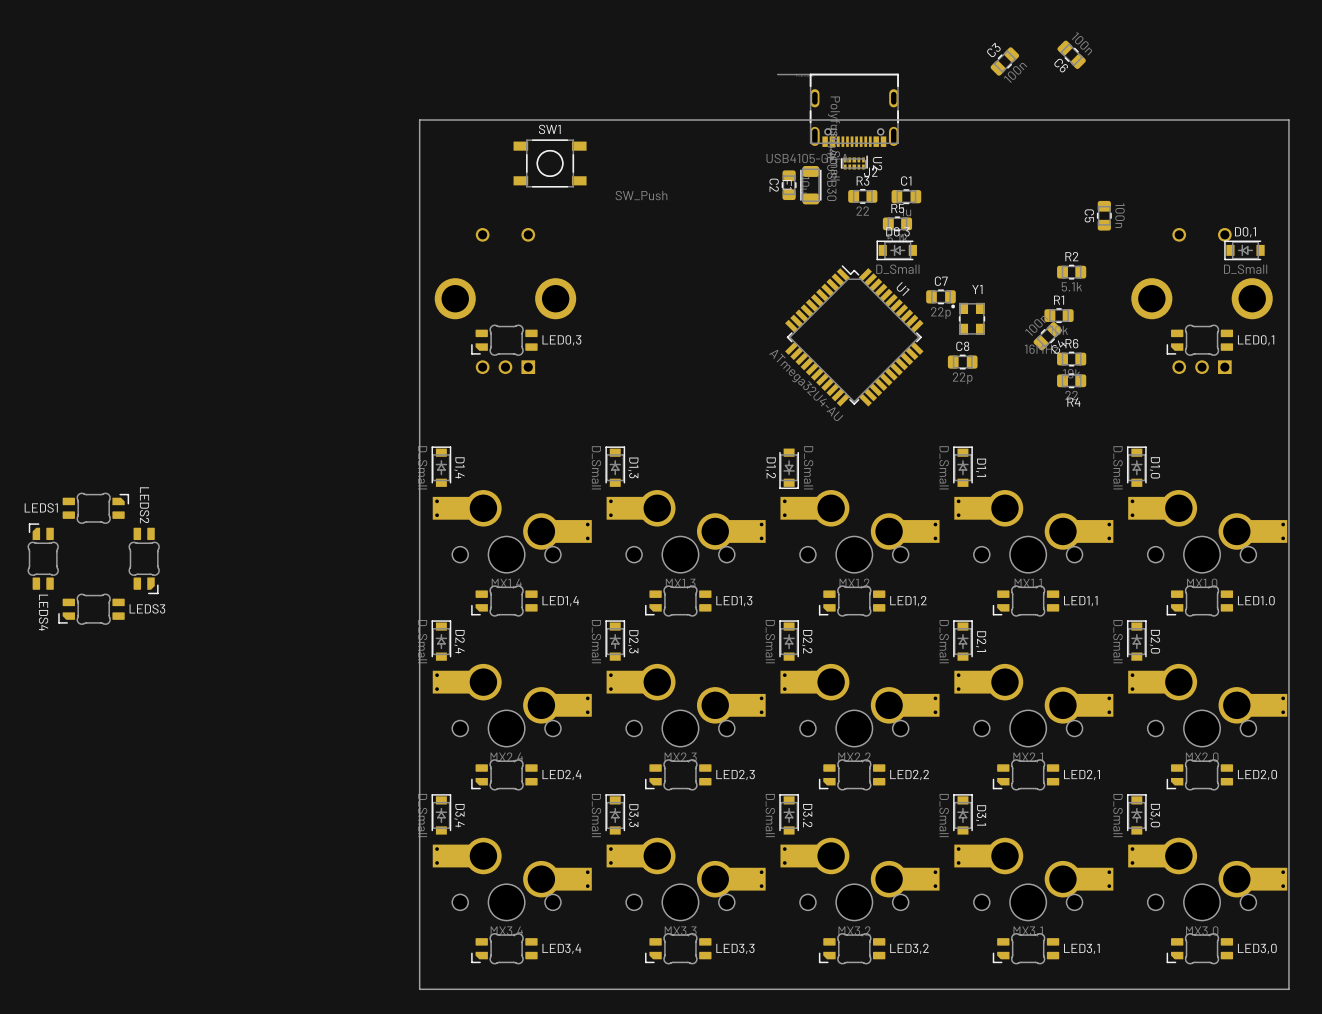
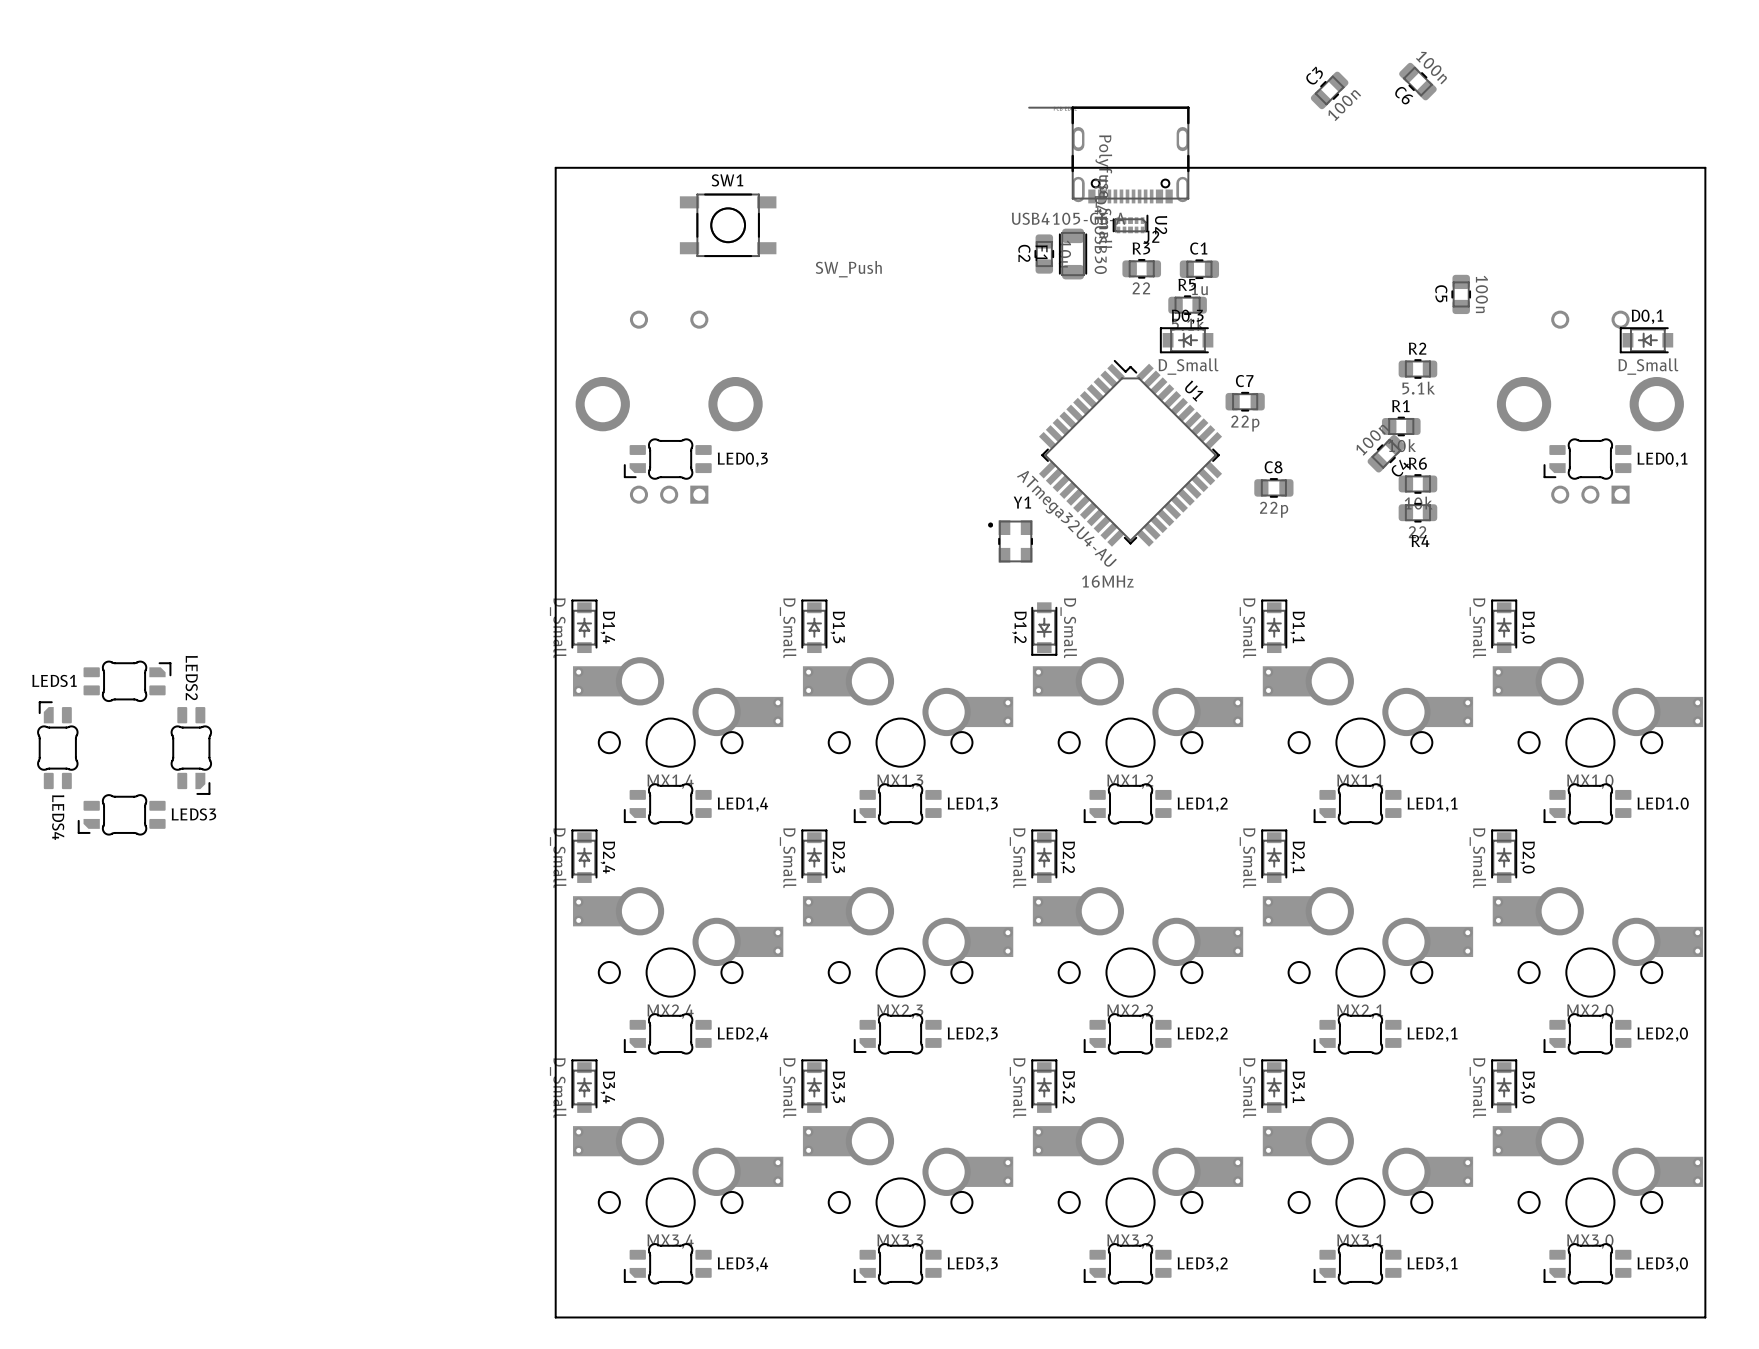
Y1 position: (968, 318) -> (1010, 541)

